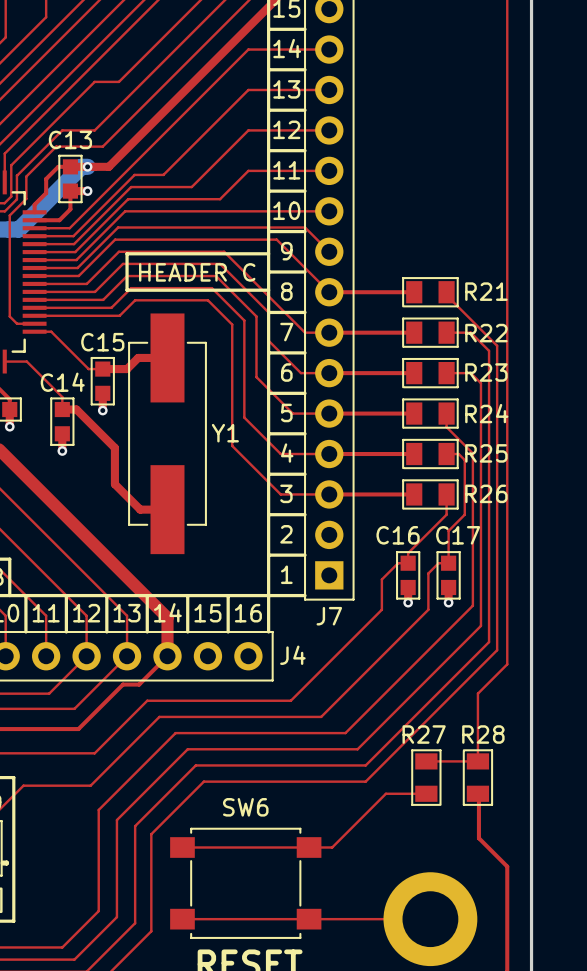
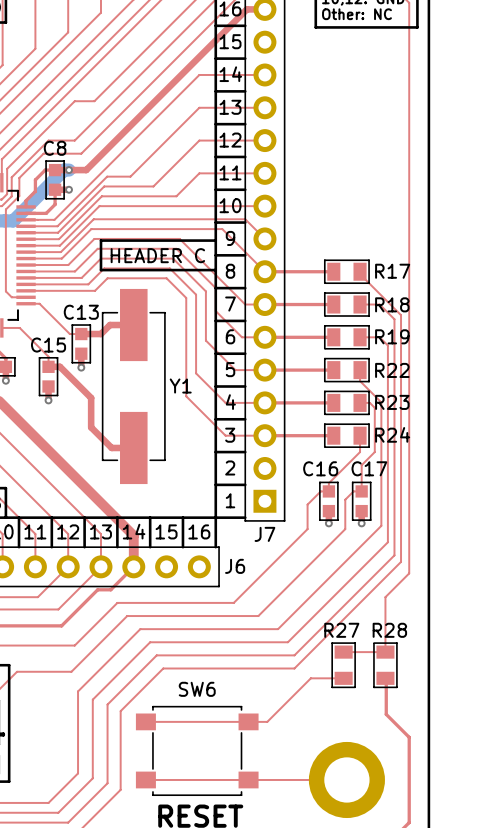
C13 name: C13 (70, 139) -> C8 (55, 148)
R21 name: R21 (486, 291) -> R17 (392, 271)
R22 name: R22 (486, 333) -> R18 (392, 304)
C15 name: C15 (102, 342) -> C13 (81, 312)
R23 name: R23 (486, 372) -> R19 (392, 336)
C14 name: C14 (62, 382) -> C15 (48, 345)
R24 name: R24 (486, 413) -> R22 (392, 370)
R25 name: R25 (486, 453) -> R23 (392, 402)
R26 name: R26 (486, 493) -> R24 (392, 434)
J4 name: J4 (292, 655) -> J6 (235, 566)

